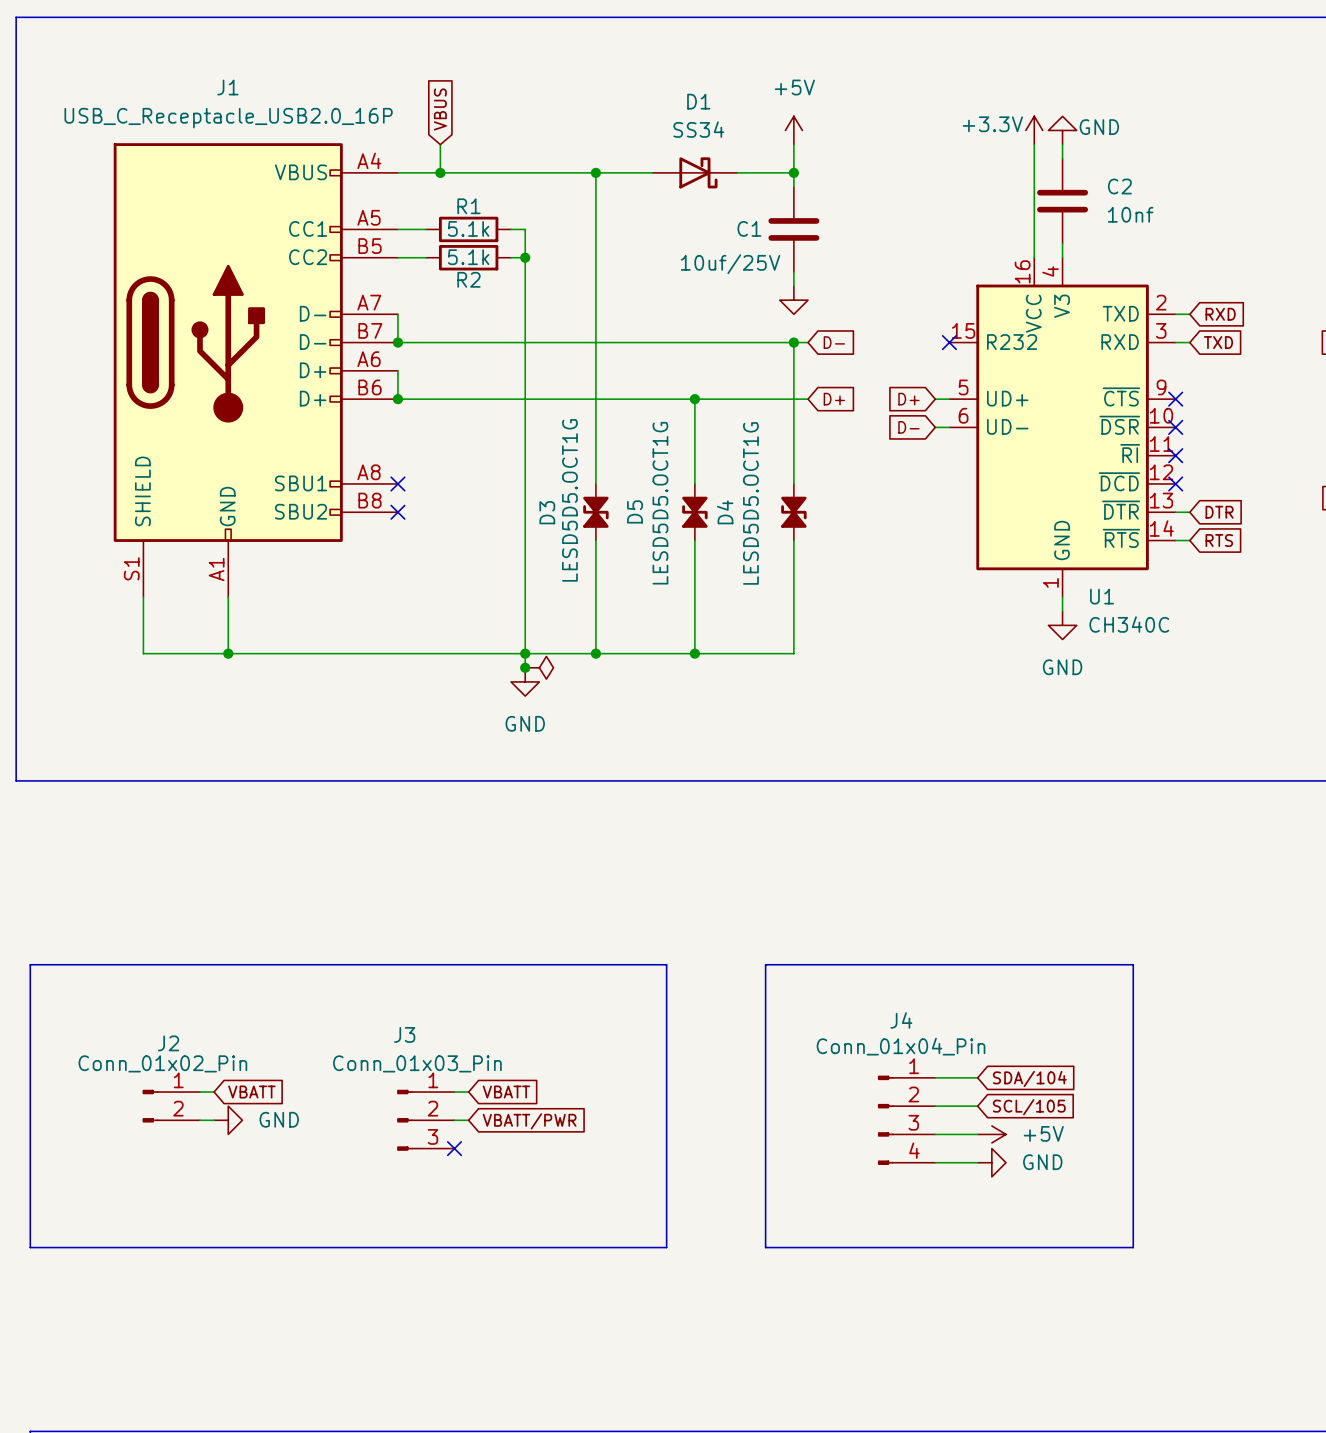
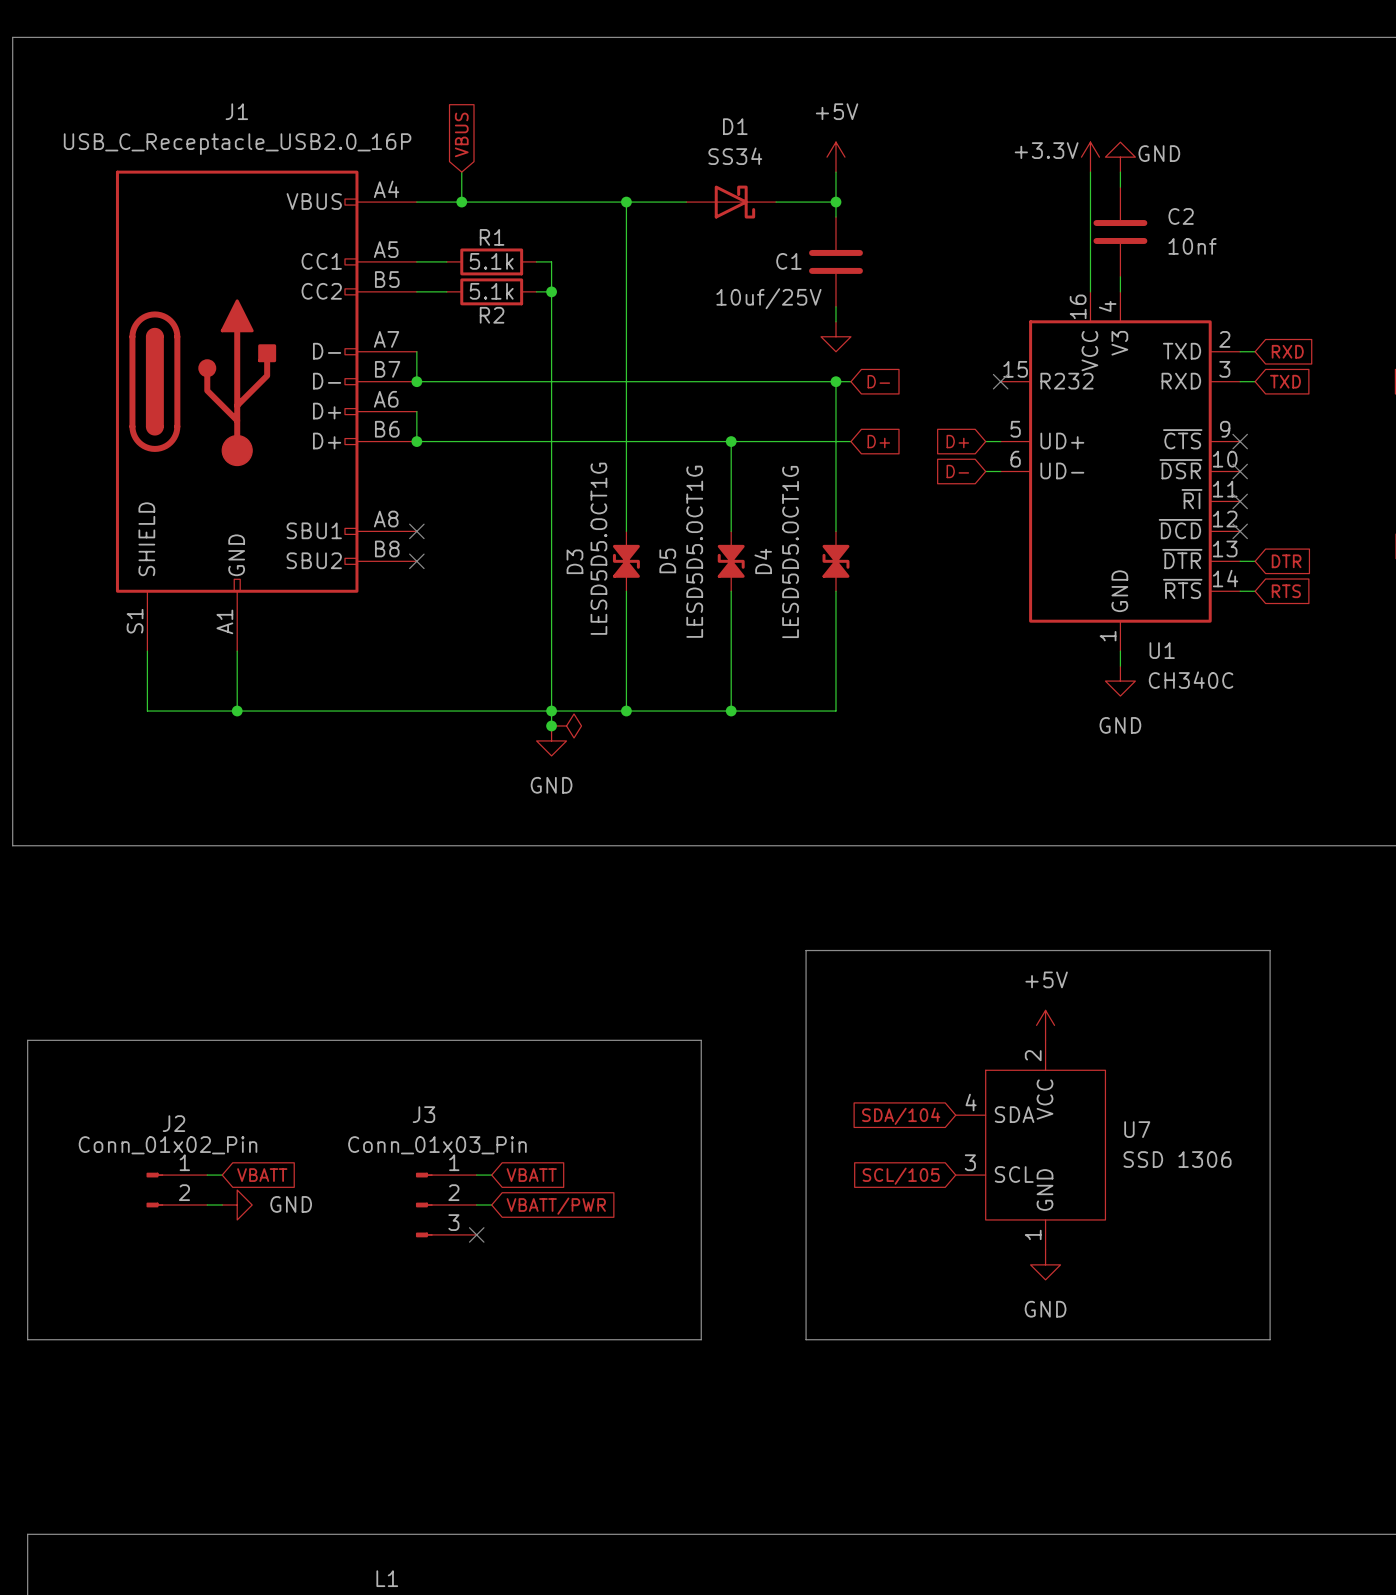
line: (765, 964) (1133, 964) (1133, 1247) -> (806, 1040) (806, 950) (1270, 950) (1270, 1339) (1195, 1339)
U7: none -> SSD 1306 (1030, 1145)
wire: (935, 1077) (977, 1077) -> none
global label rotation: 0° (1029, 1078) -> 180° (901, 1116)
global label position: SDA/104 (1029, 1078) -> SDA/104 (901, 1116)
wire: (935, 1106) (977, 1106) -> none
global label rotation: 0° (1029, 1107) -> 180° (901, 1176)
global label position: SCL/105 (1029, 1107) -> SCL/105 (901, 1176)
J4: Conn_01x04_Pin (906, 1120) -> none
power symbol rotation: 0° (991, 1134) -> 90° counterclockwise (1045, 1025)
power symbol position: +5V (991, 1134) -> +5V (1045, 1025)
wire: (935, 1162) (977, 1162) -> none
power symbol rotation: 0° (991, 1162) -> 90° clockwise (1045, 1264)

